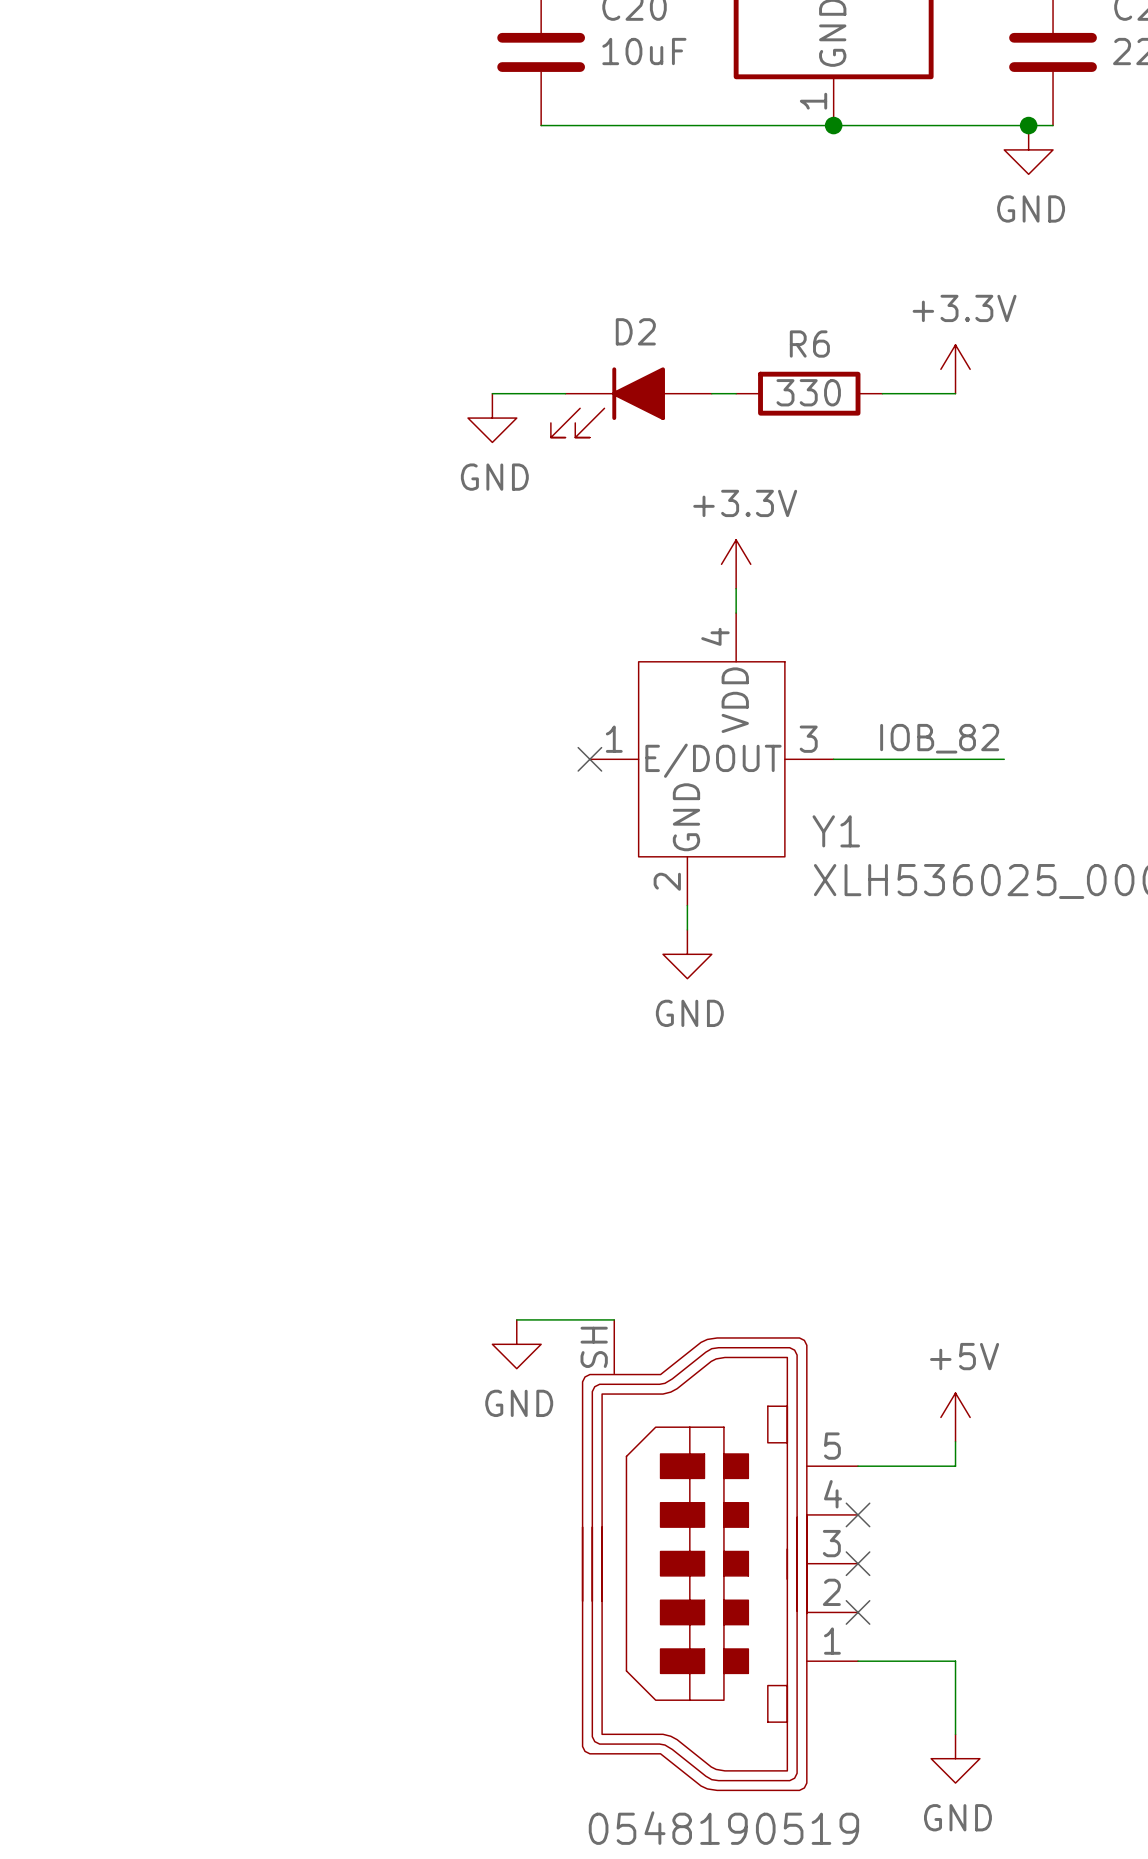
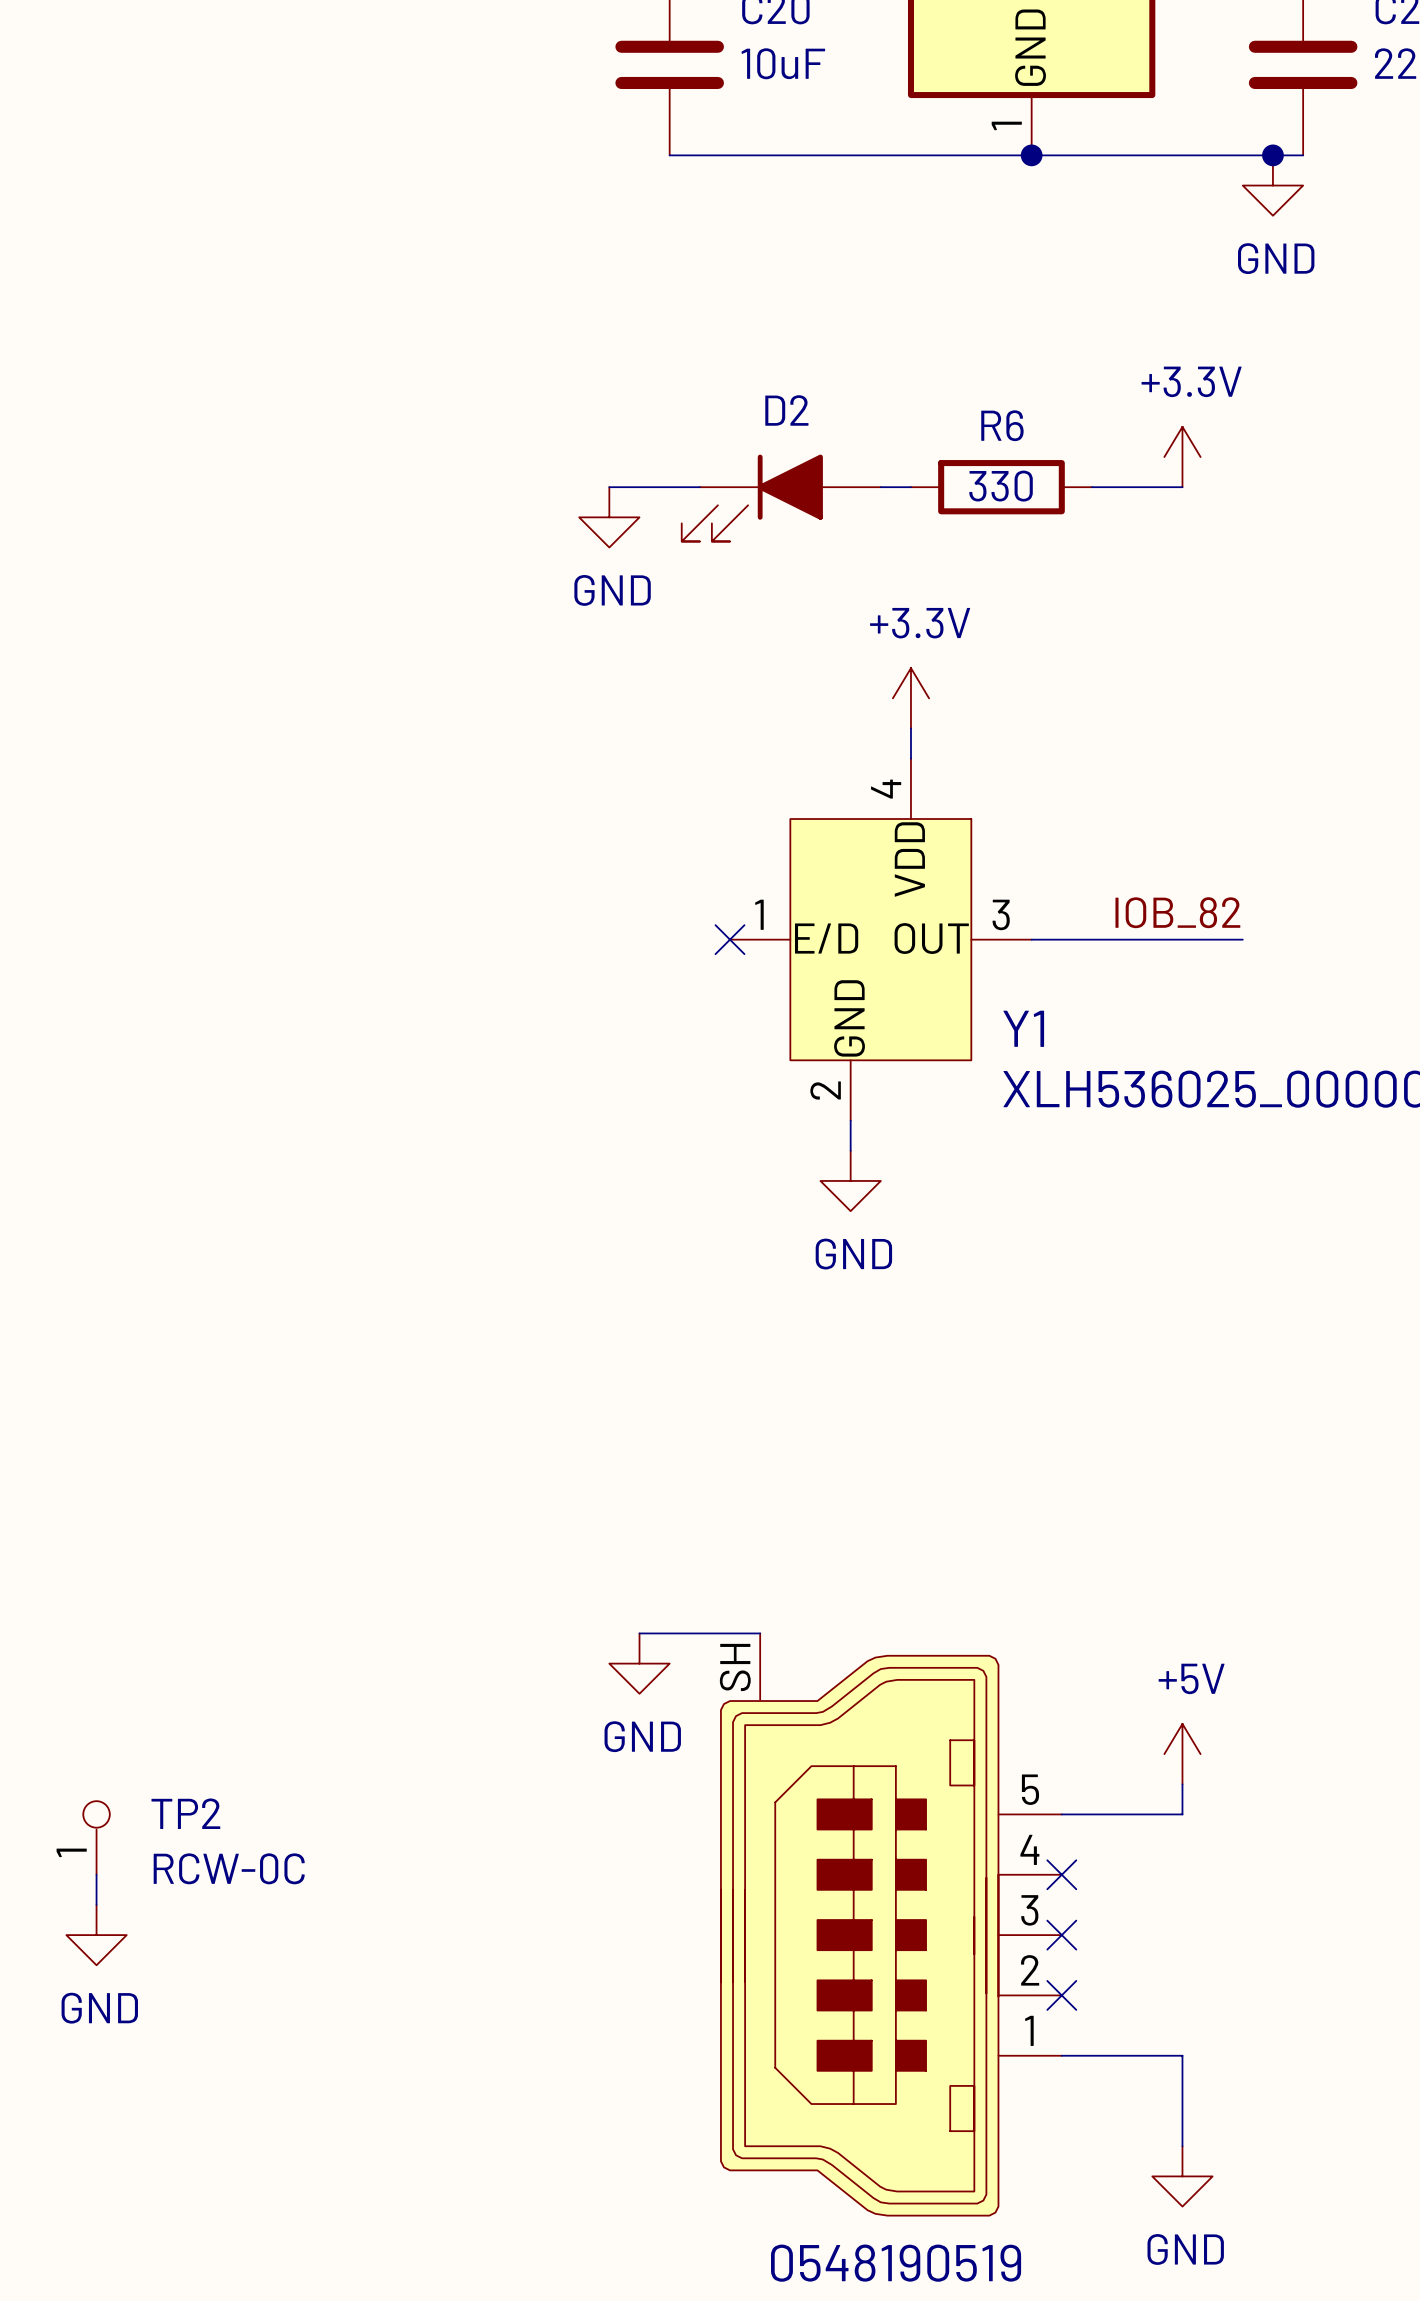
TP2: none -> RCW-0C (96, 1837)
wire: none -> (96, 1874) (96, 1904)
power symbol: none -> GND (96, 1935)

